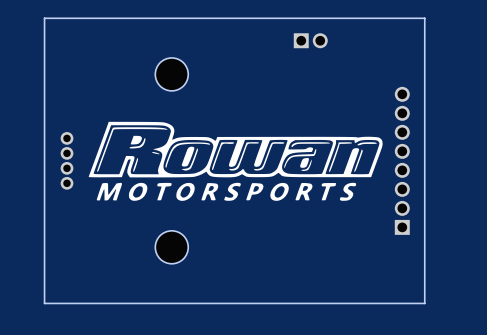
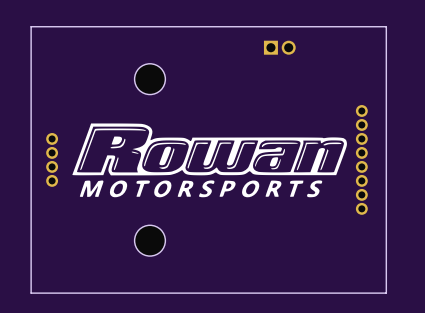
part footprint: [394, 86, 410, 235] -> [355, 105, 368, 215]

